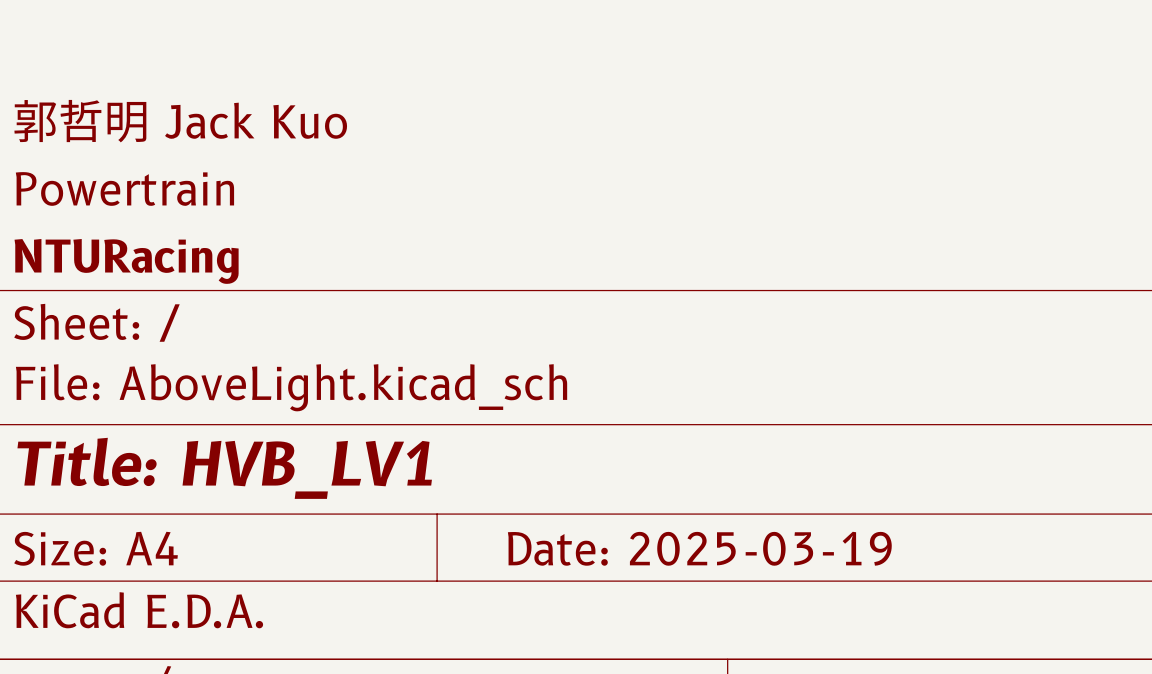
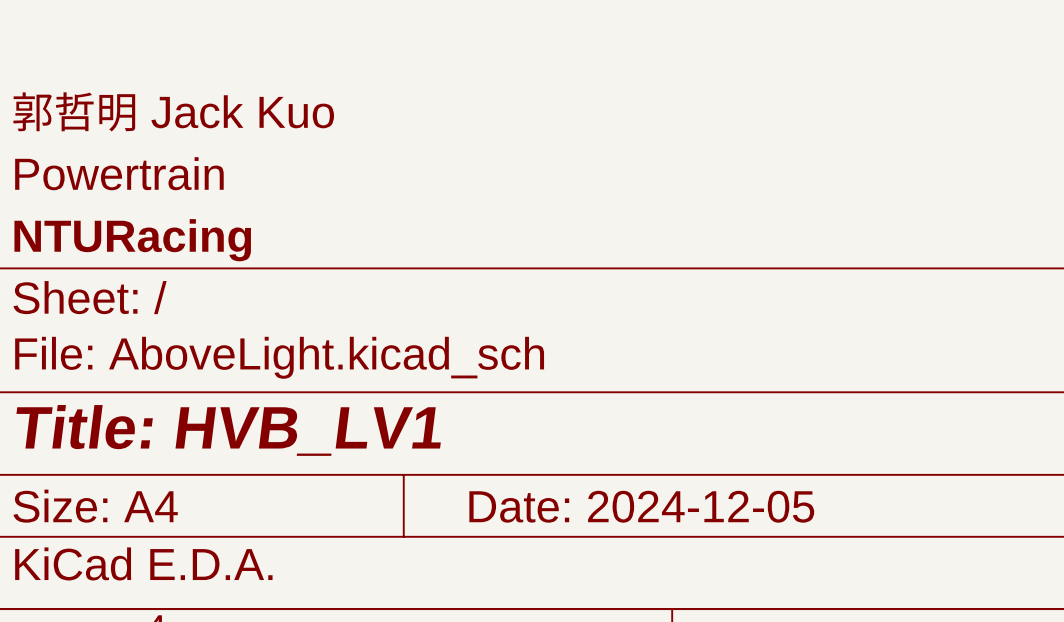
title block: Date: 2025-03-19 (699, 548) -> Date: 2024-12-05 (641, 506)

